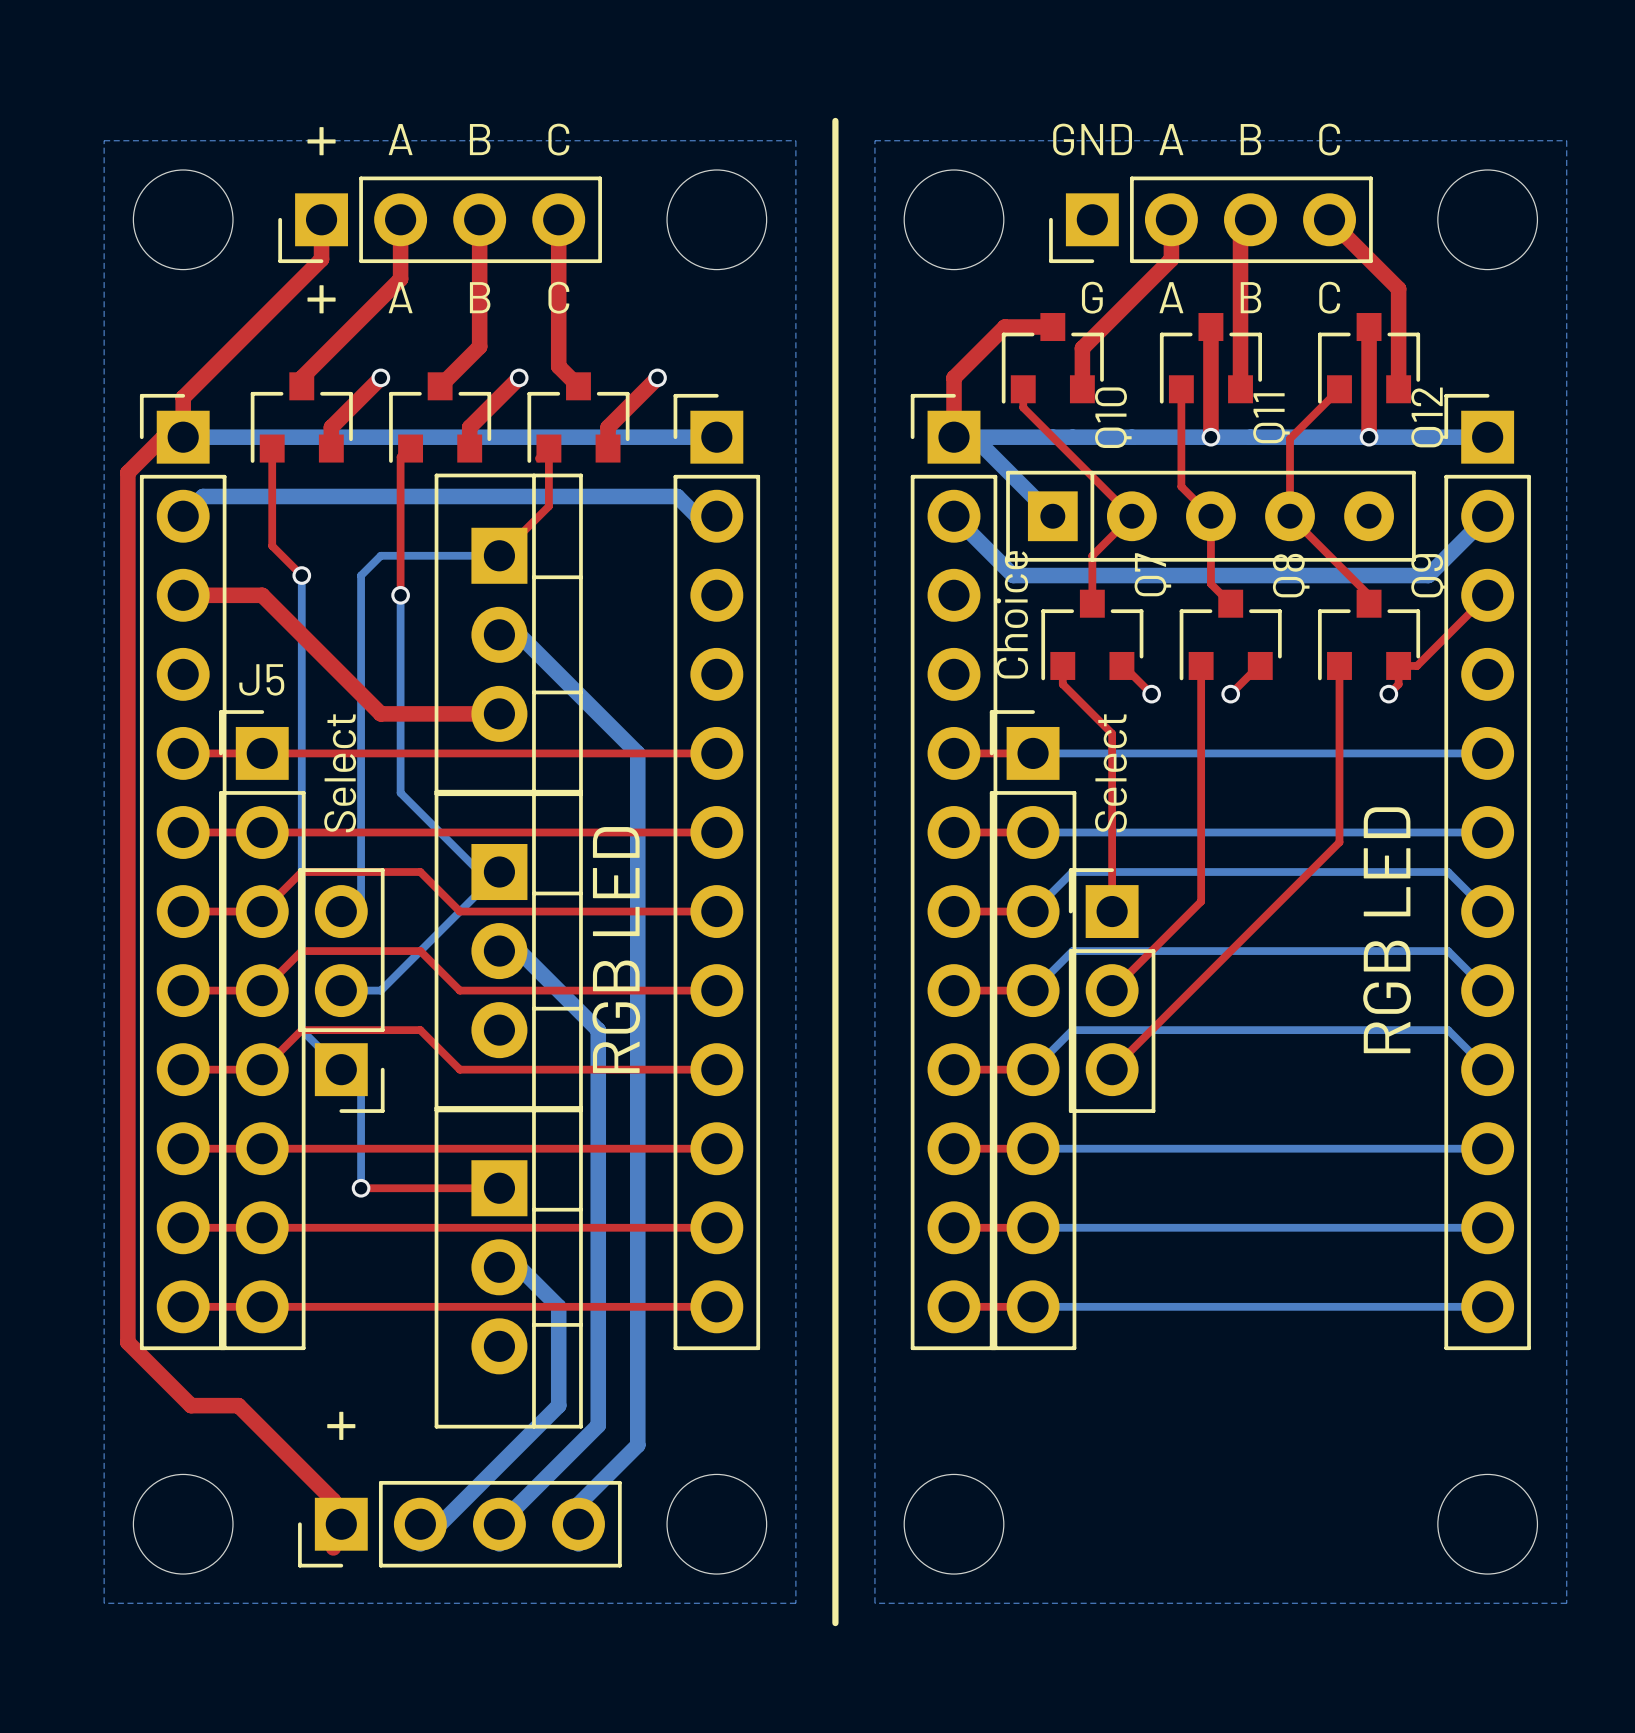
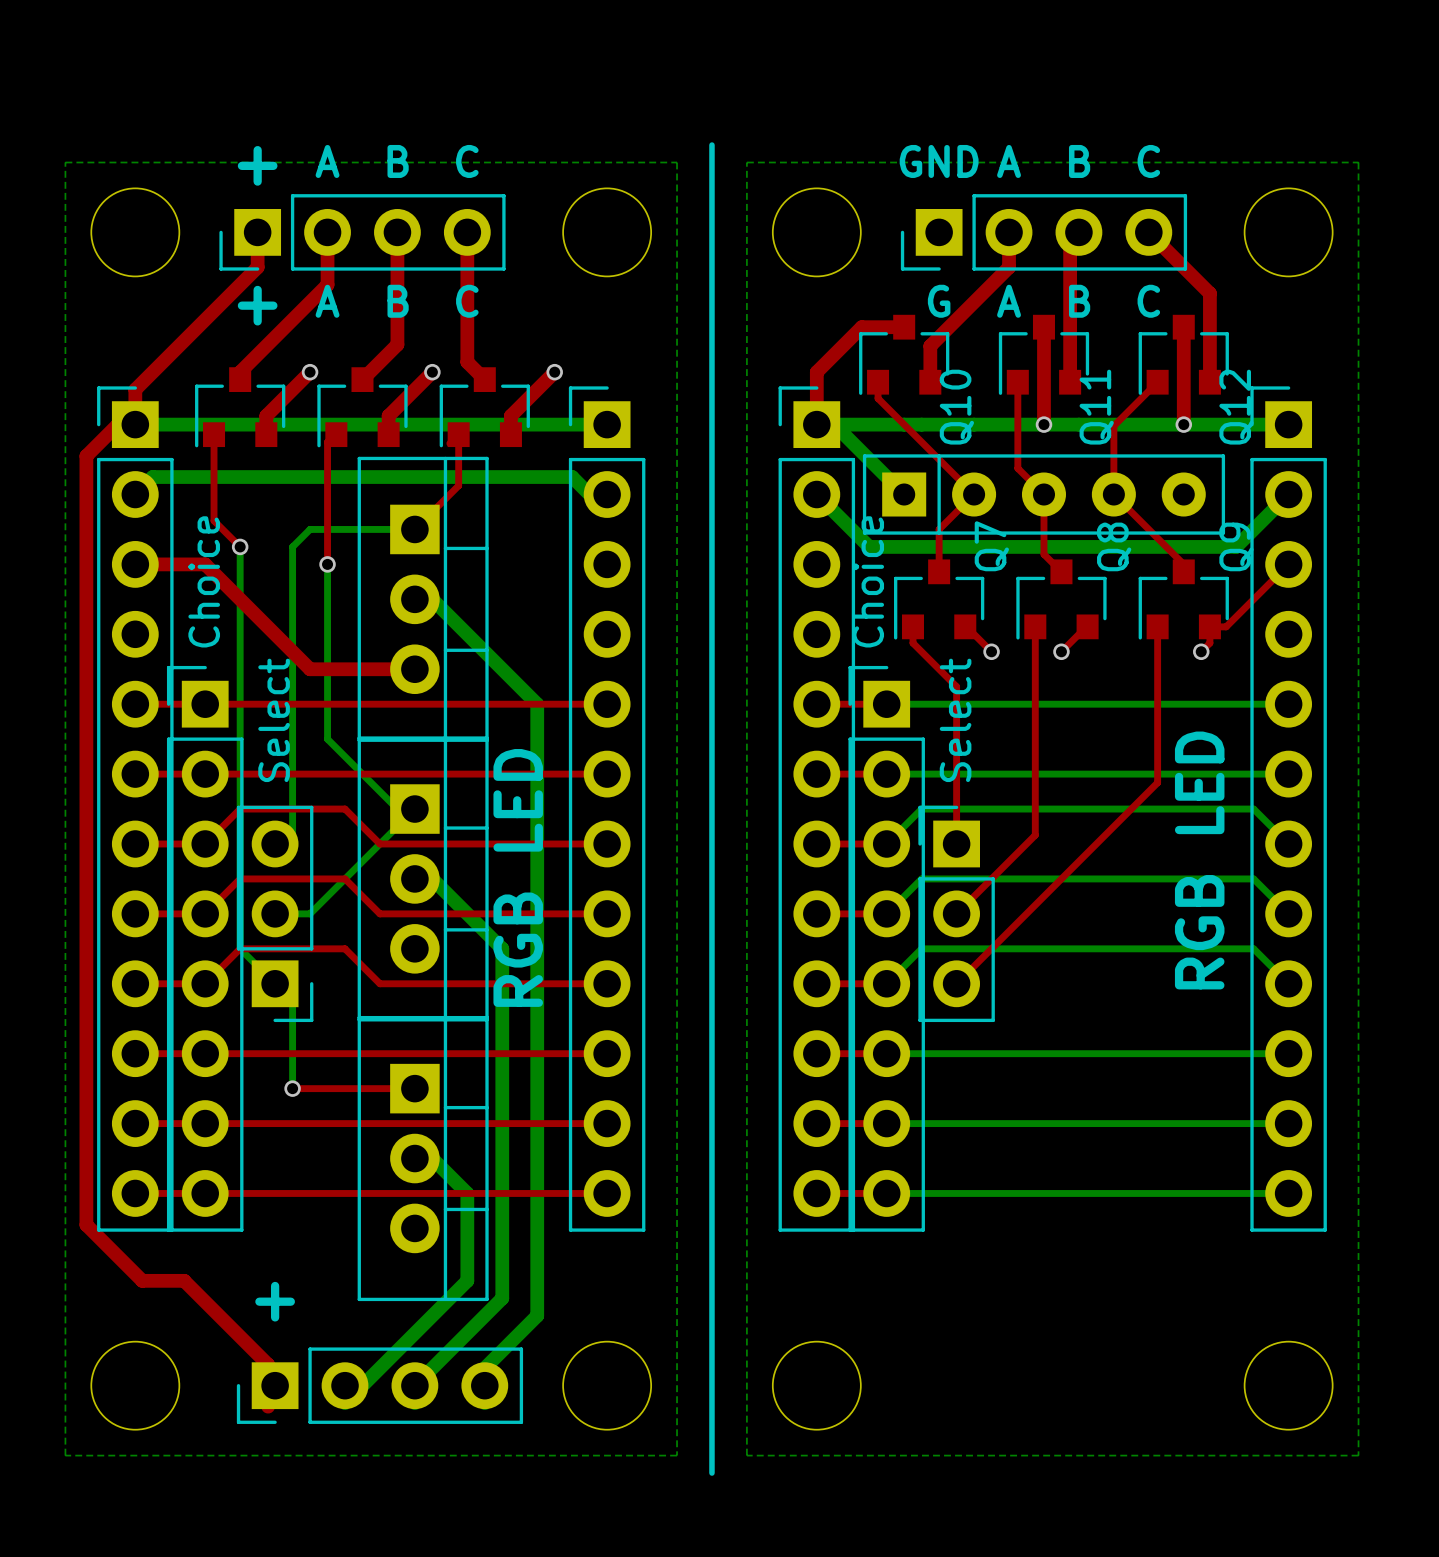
J5 value: none -> Choice (204, 581)
J5 name: J5 (261, 679) -> none

